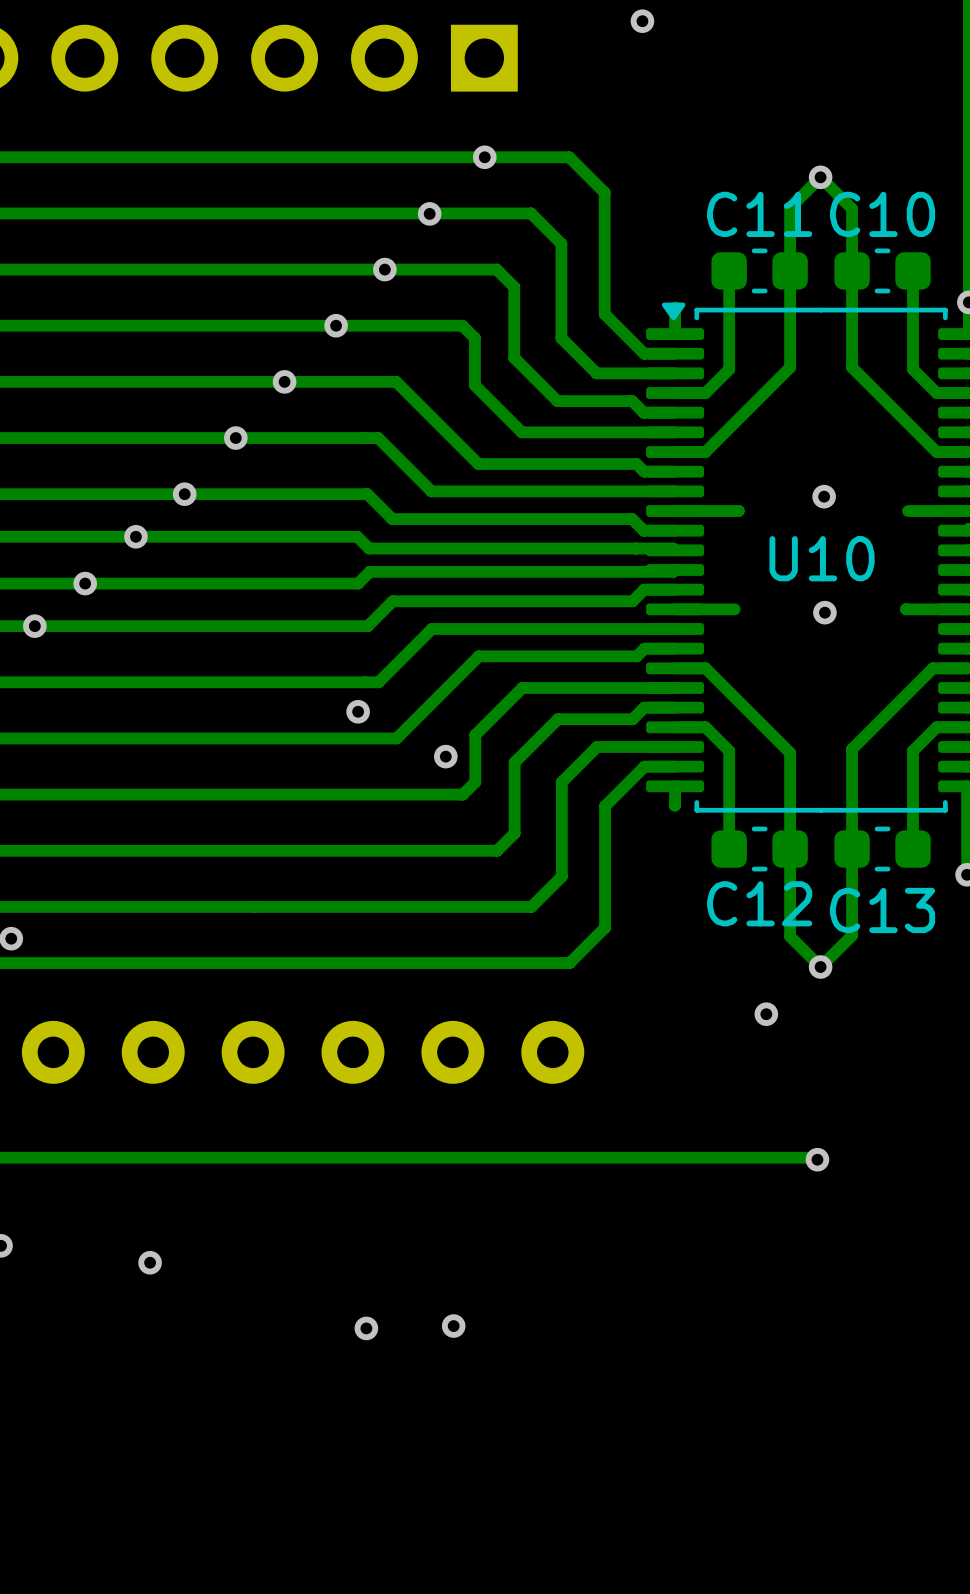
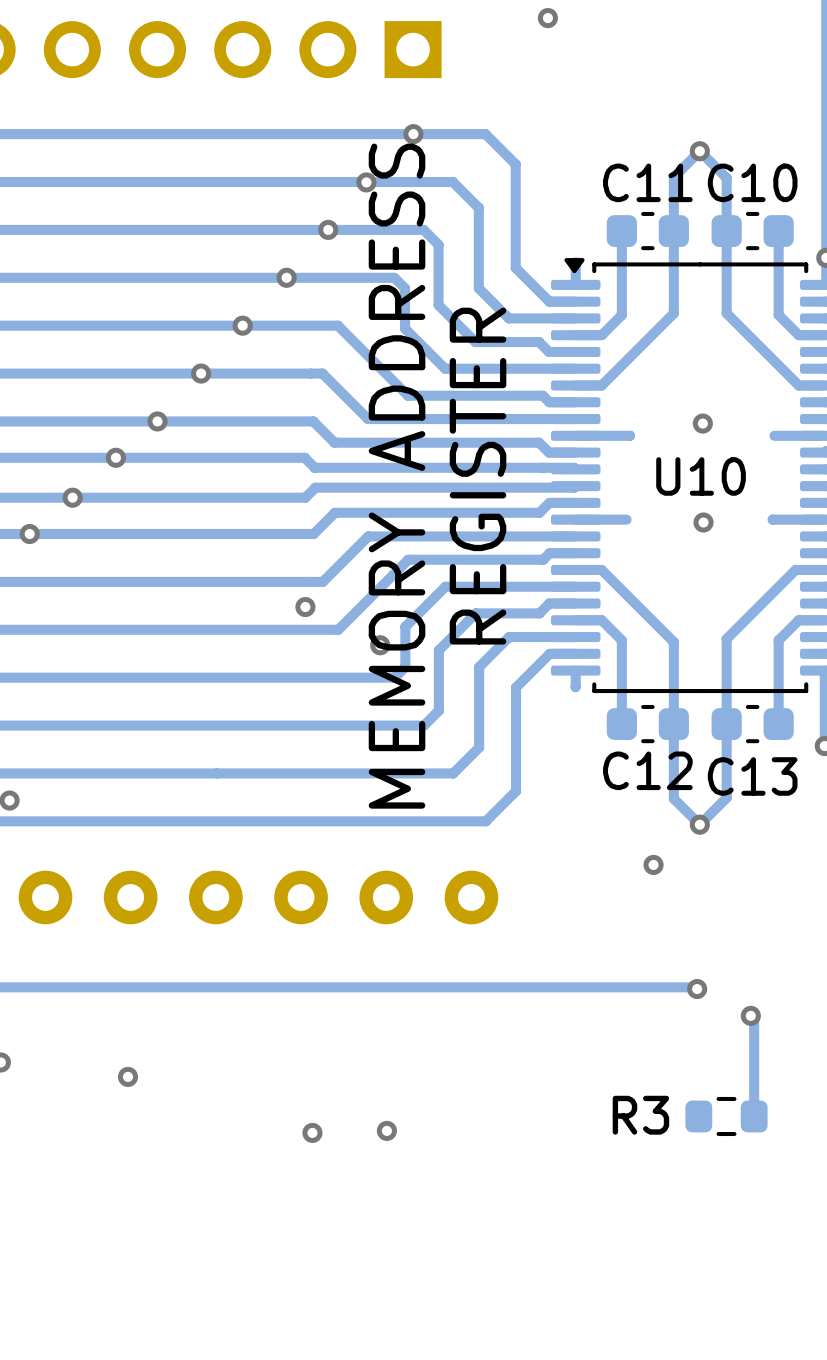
text: none -> MEMORY ADDRESS (397, 476)
text: none -> REGISTER (478, 476)
track: none -> (750, 1015) (754, 1019) (754, 1116)
via: none -> (750, 1015)
R3: none -> (726, 1116)

